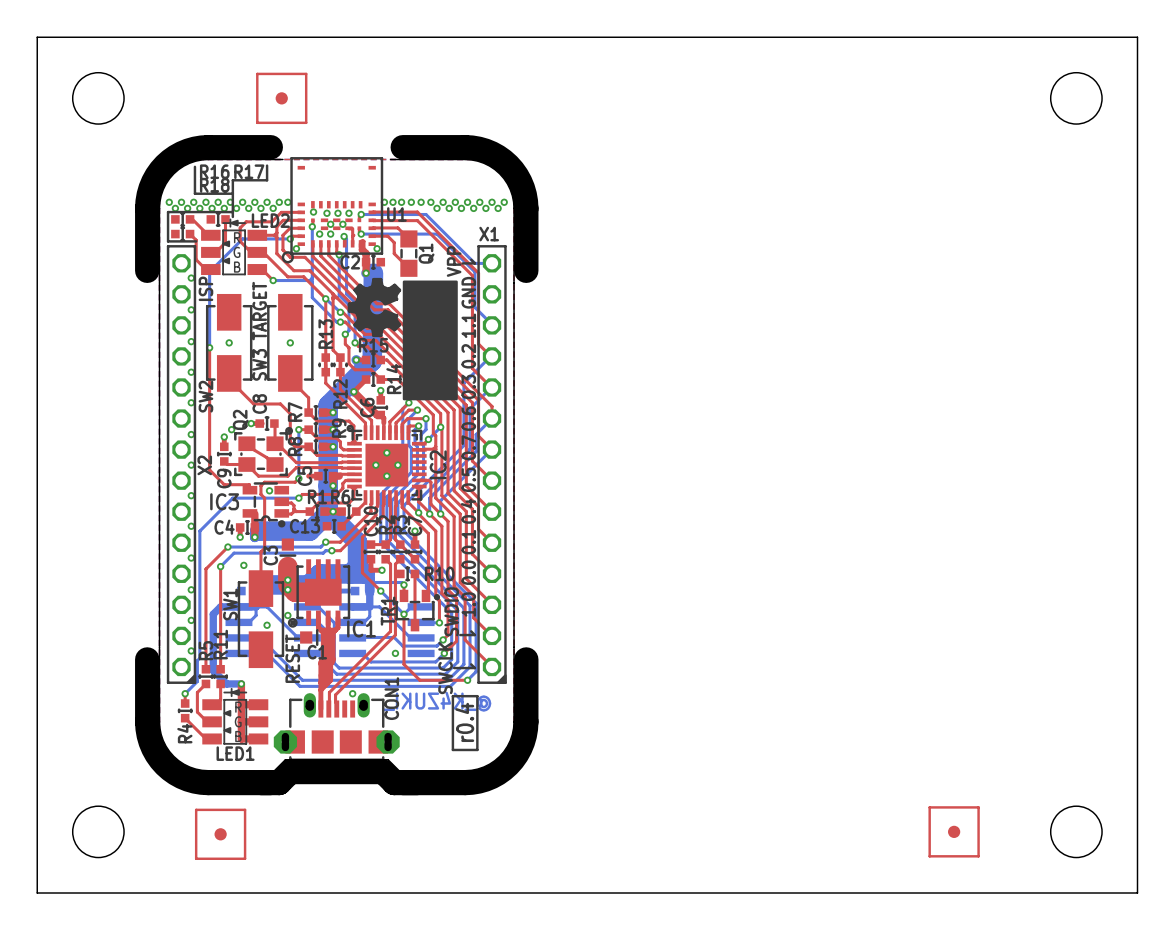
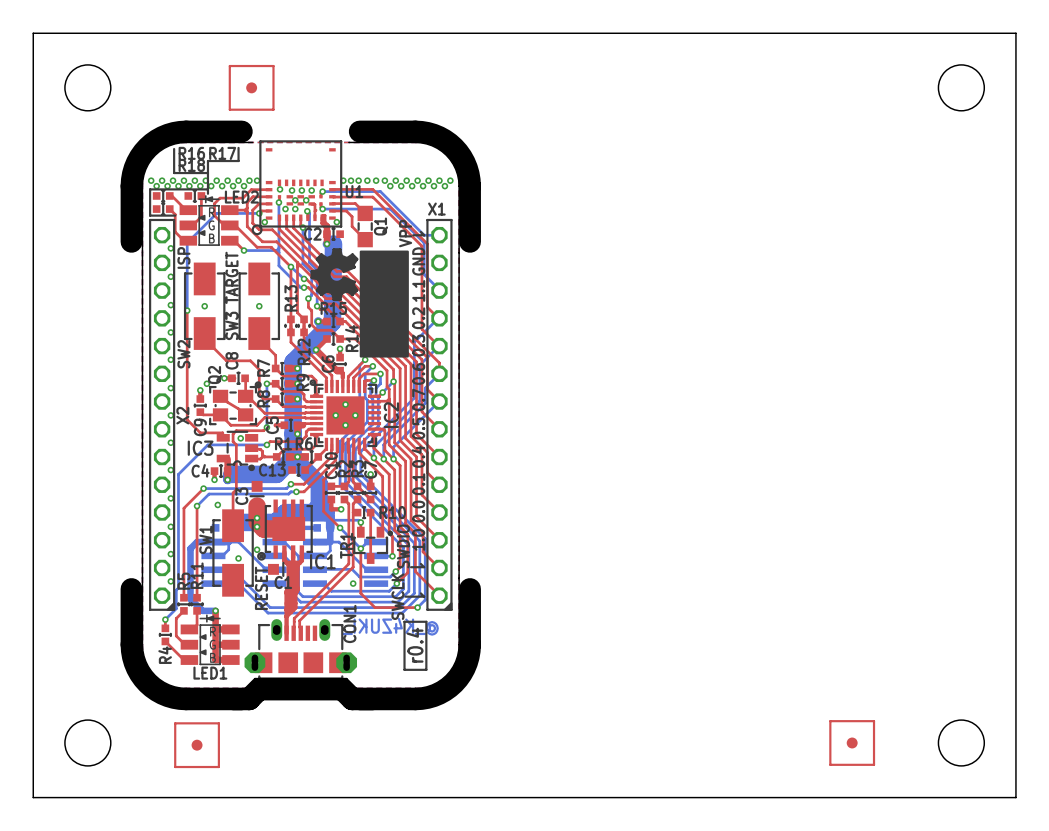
via: (352, 693) -> none

